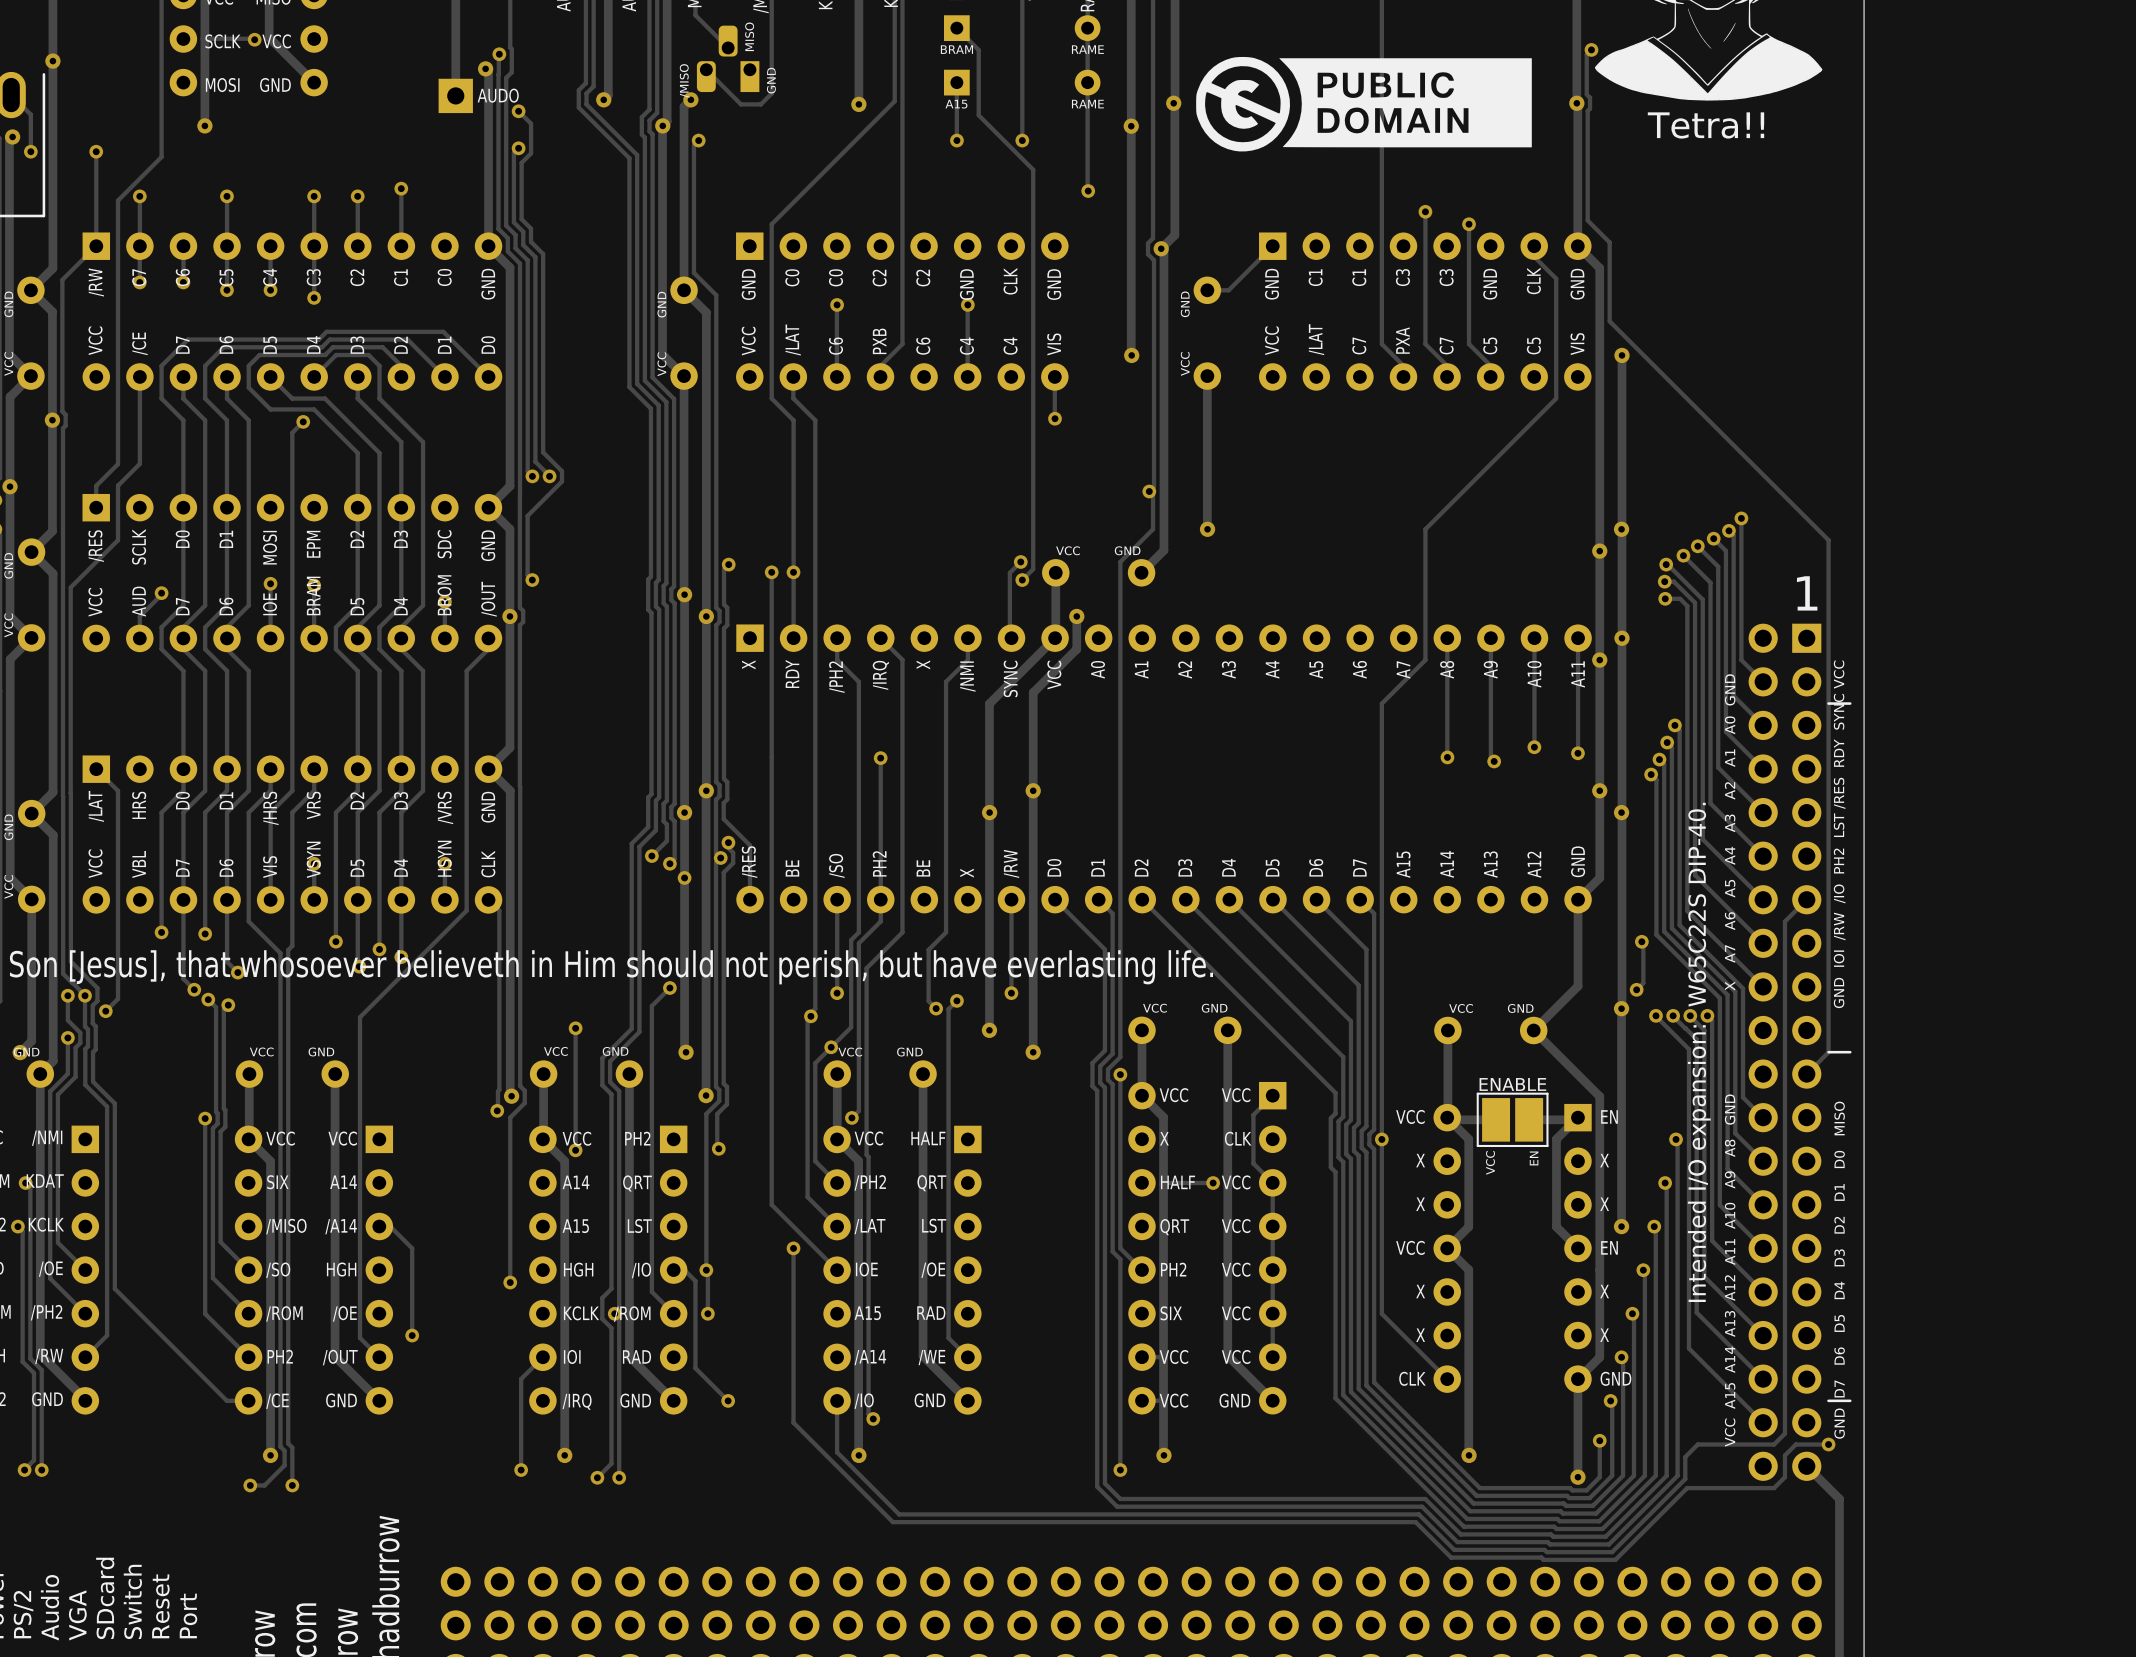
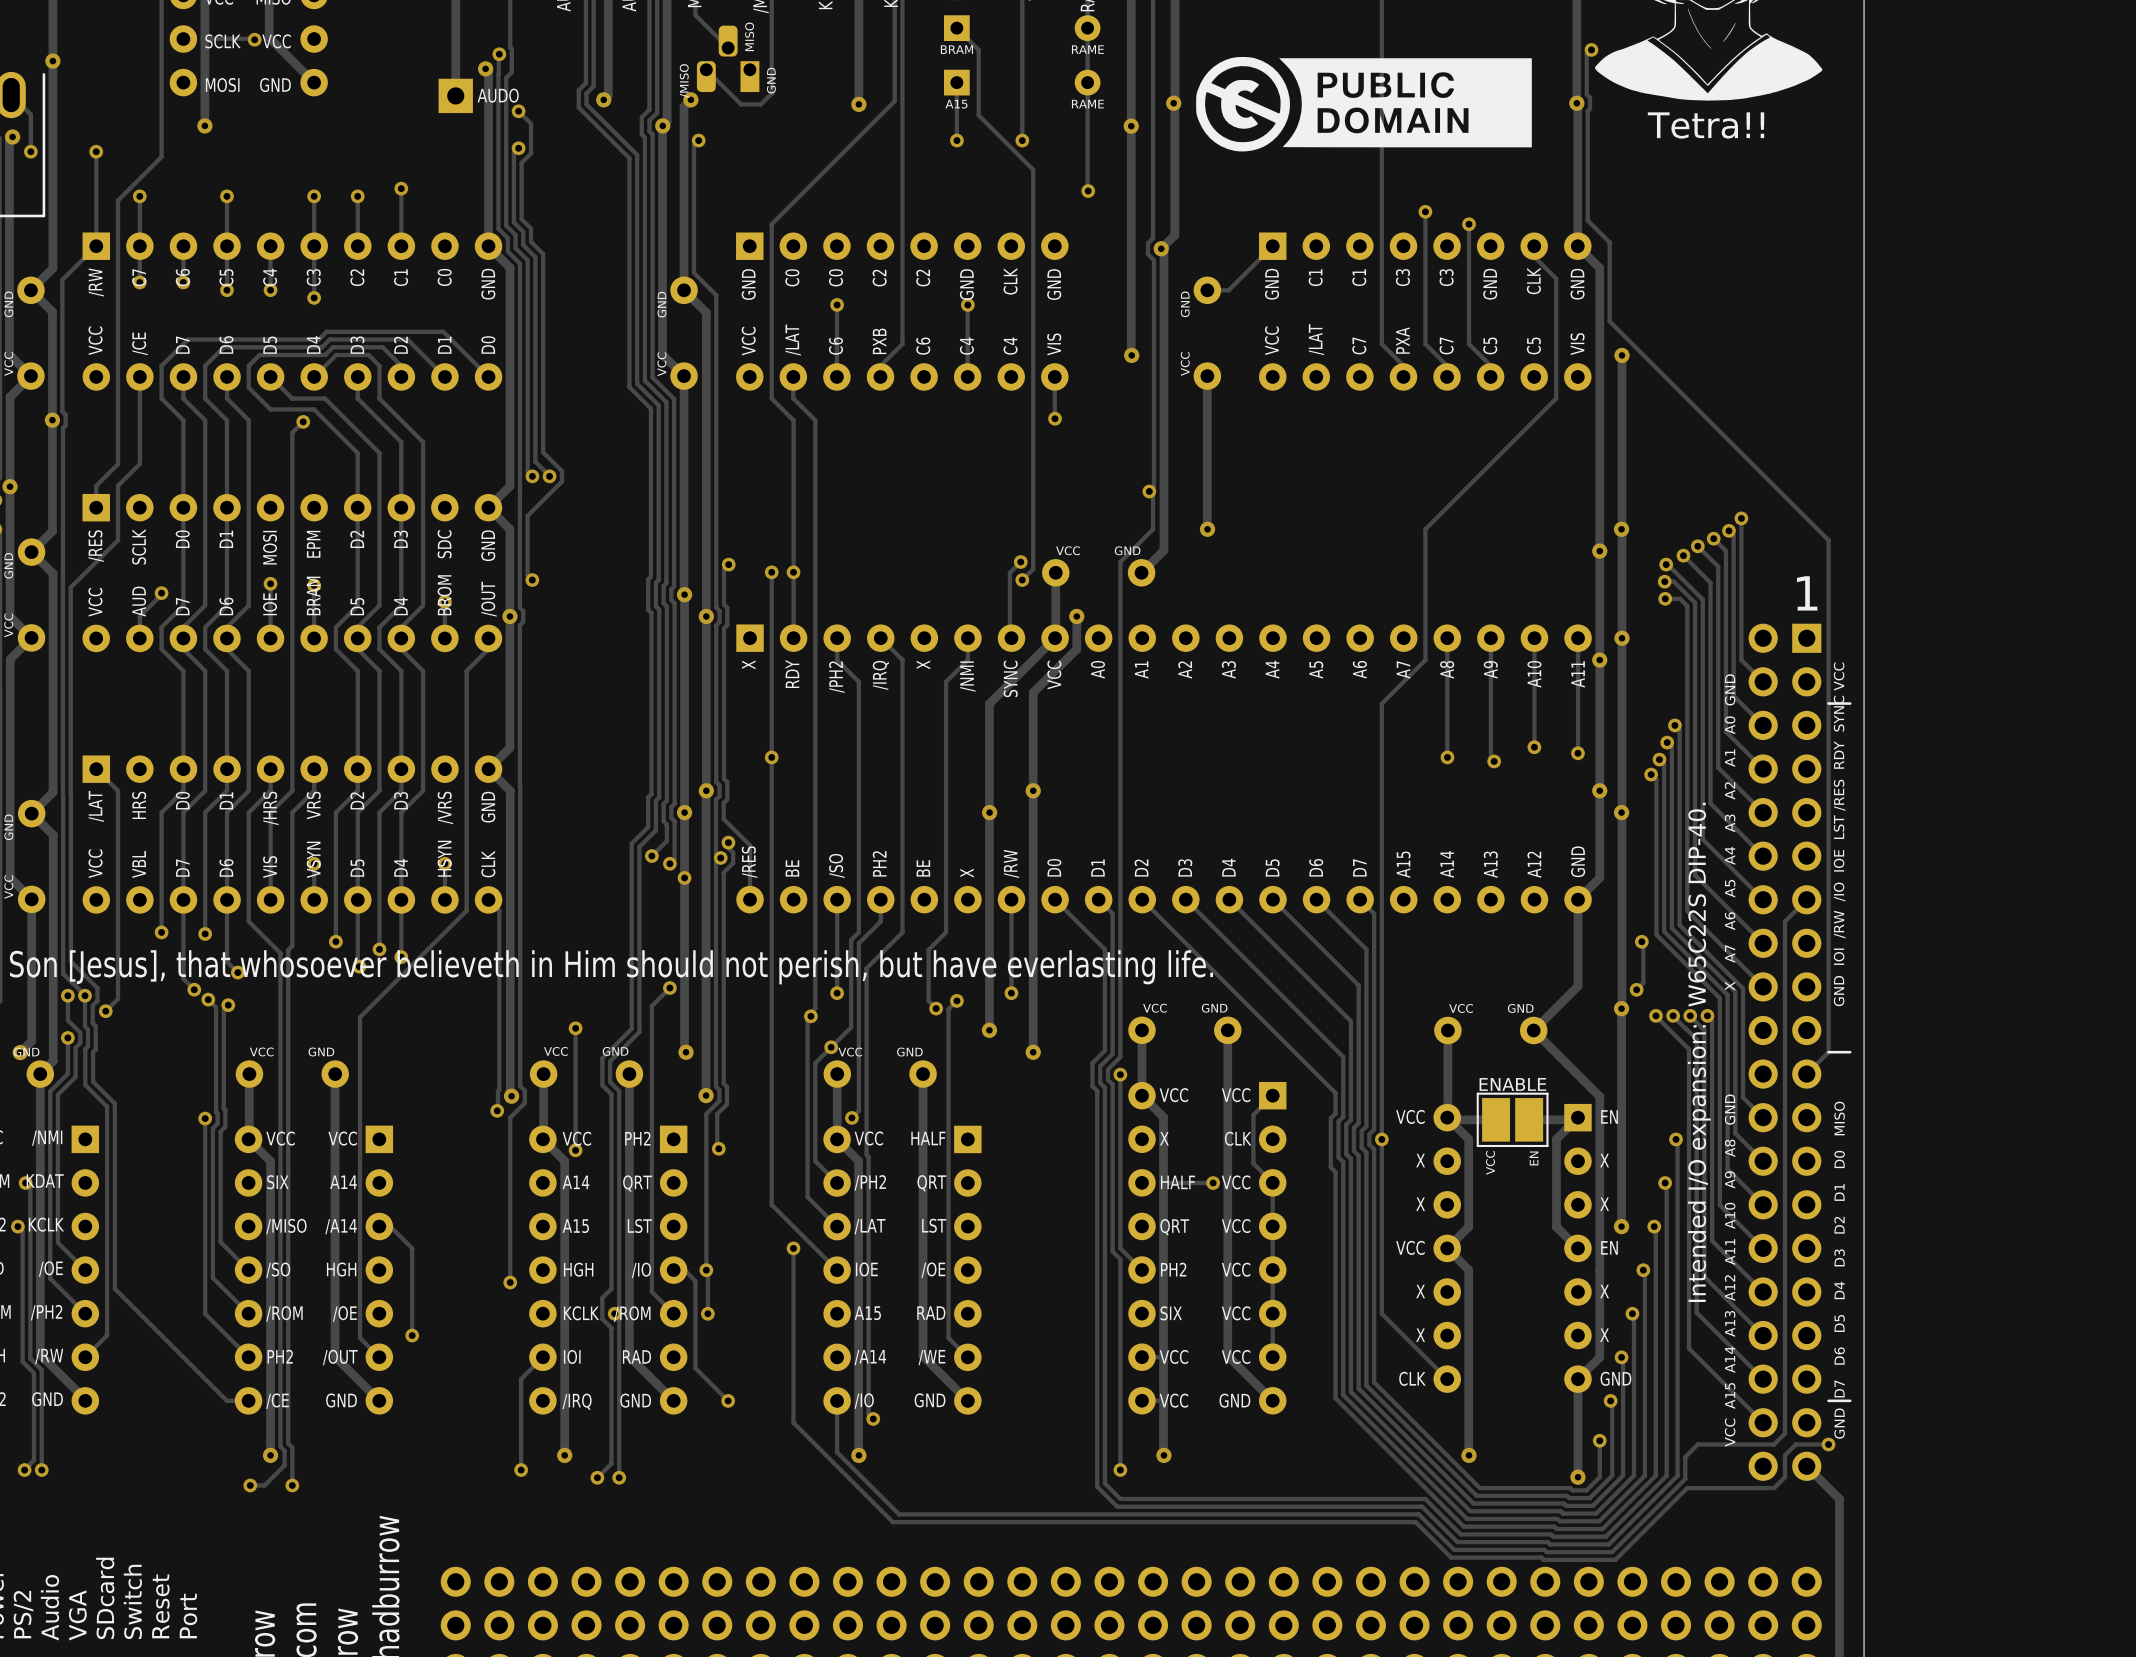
via: none -> (771, 757)
track: (880, 758) (880, 899) -> none
via: (880, 758) -> none
text: GND IOI /RW /IO PH2 LST /RES RDY SYNC VCC (1839, 834) -> GND IOI /RW /IO IOE LST /RES RDY SYNC VCC (1839, 834)

